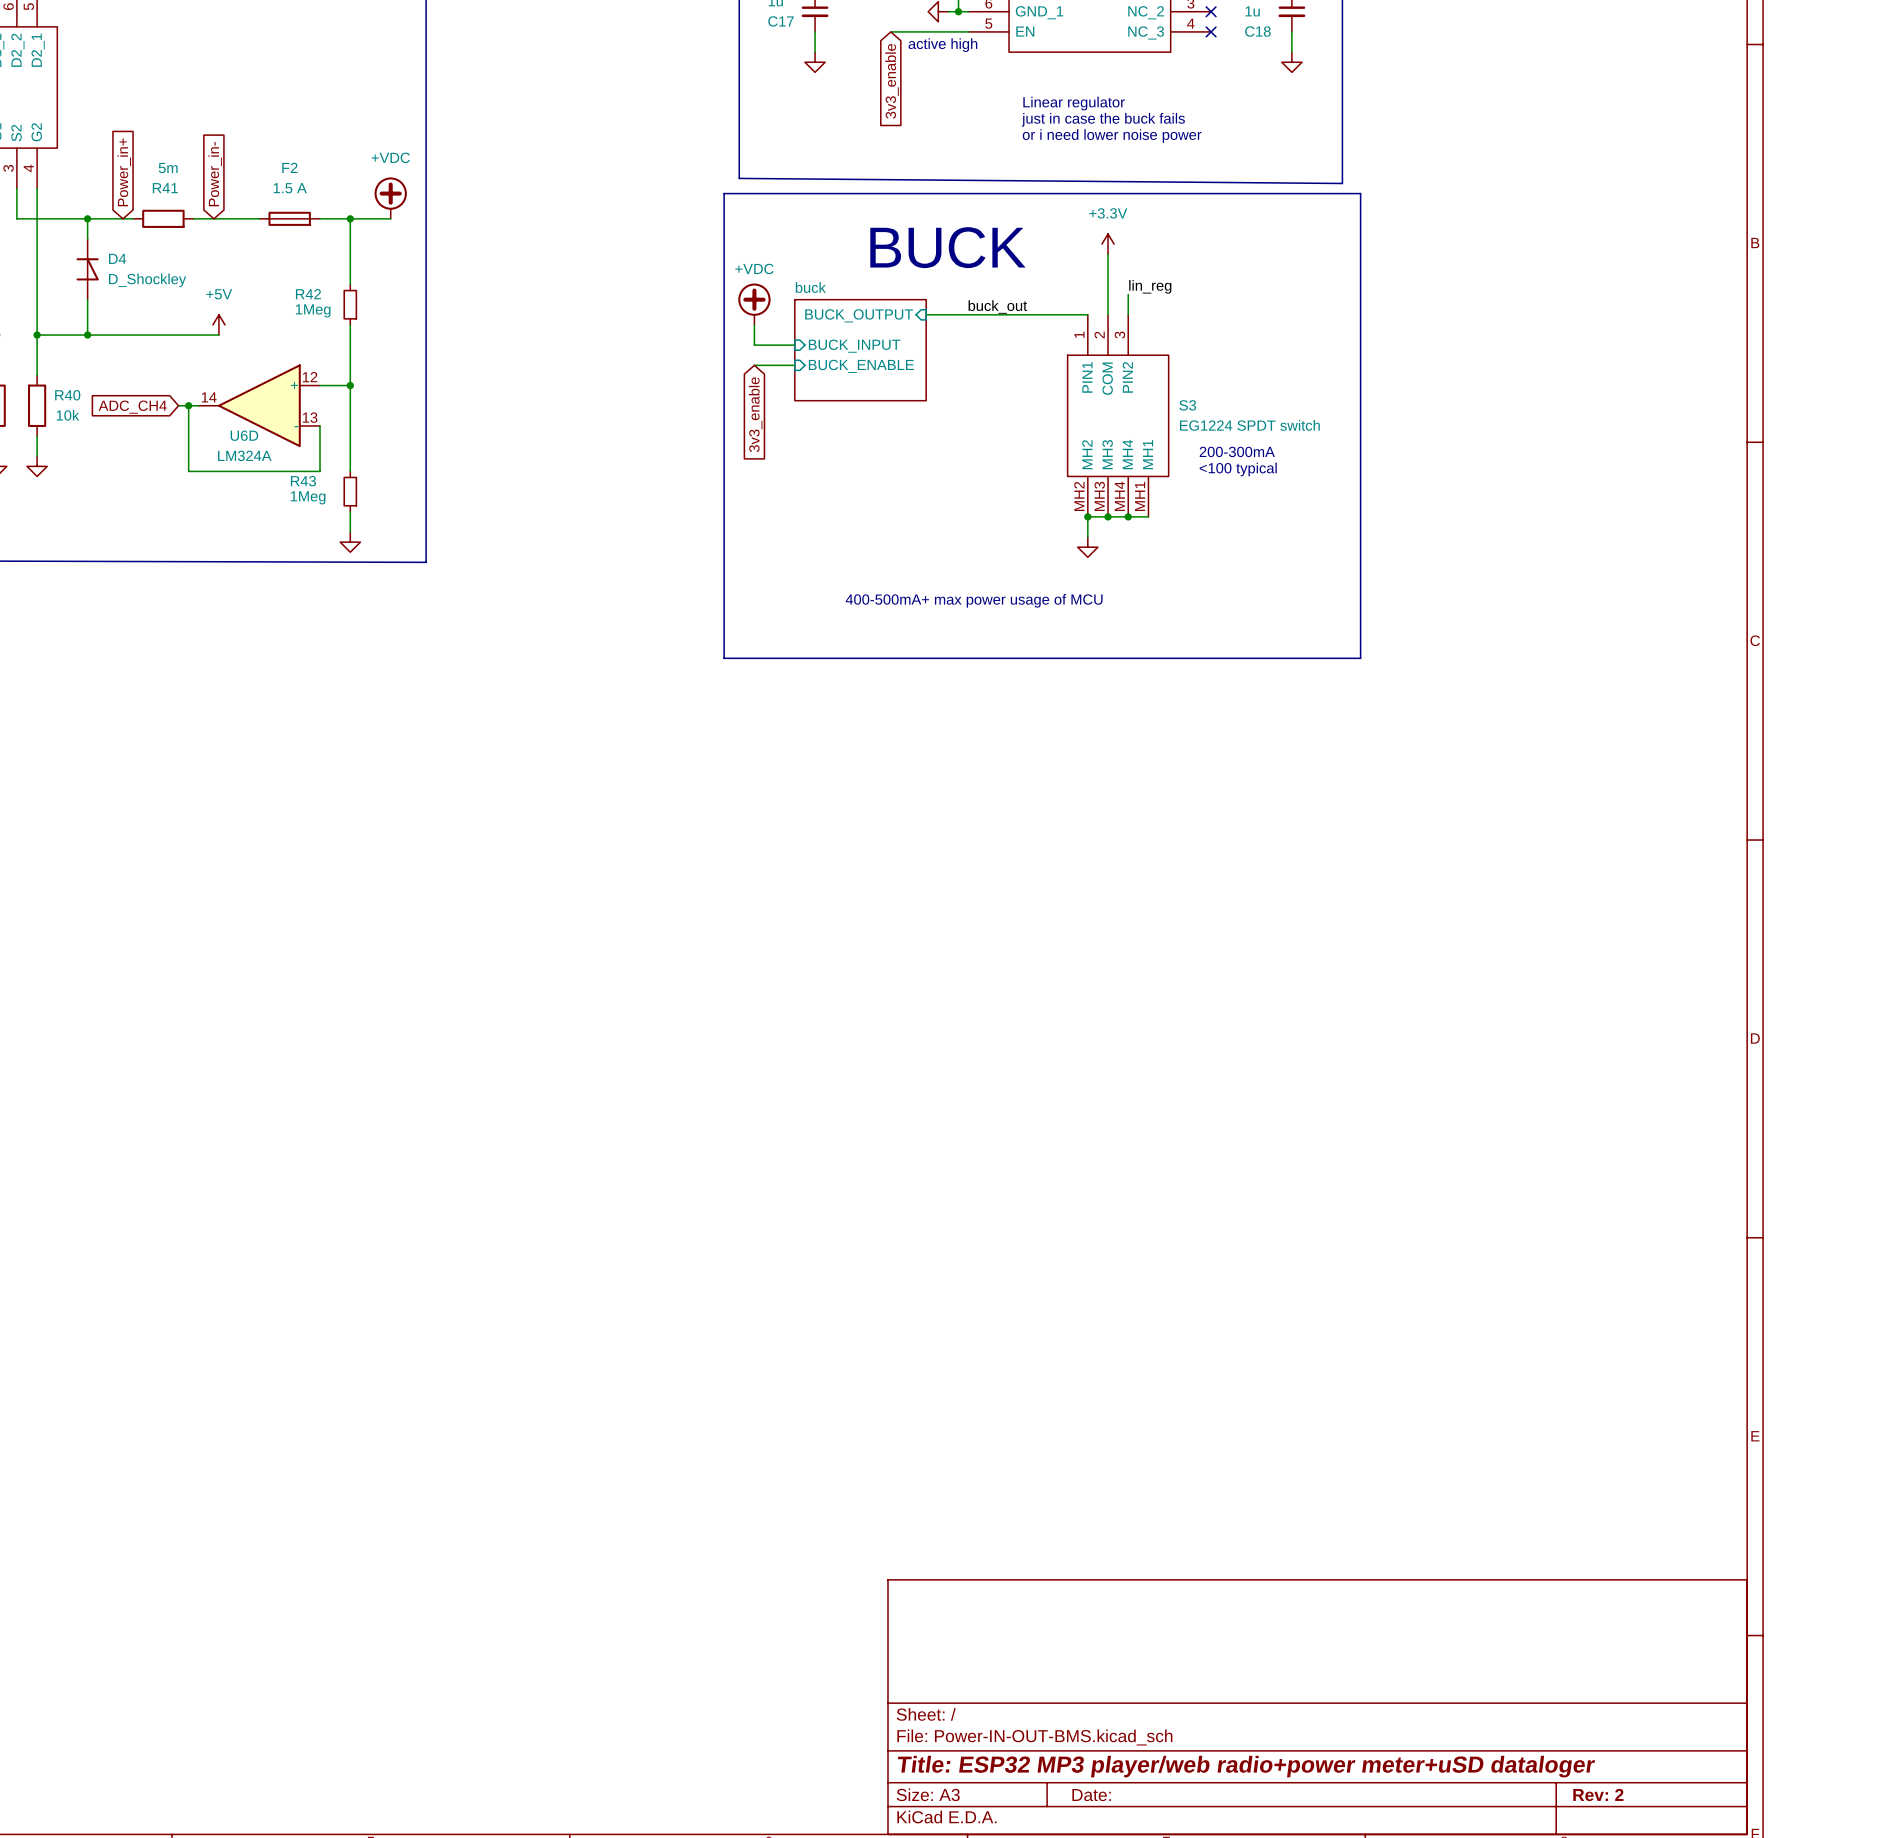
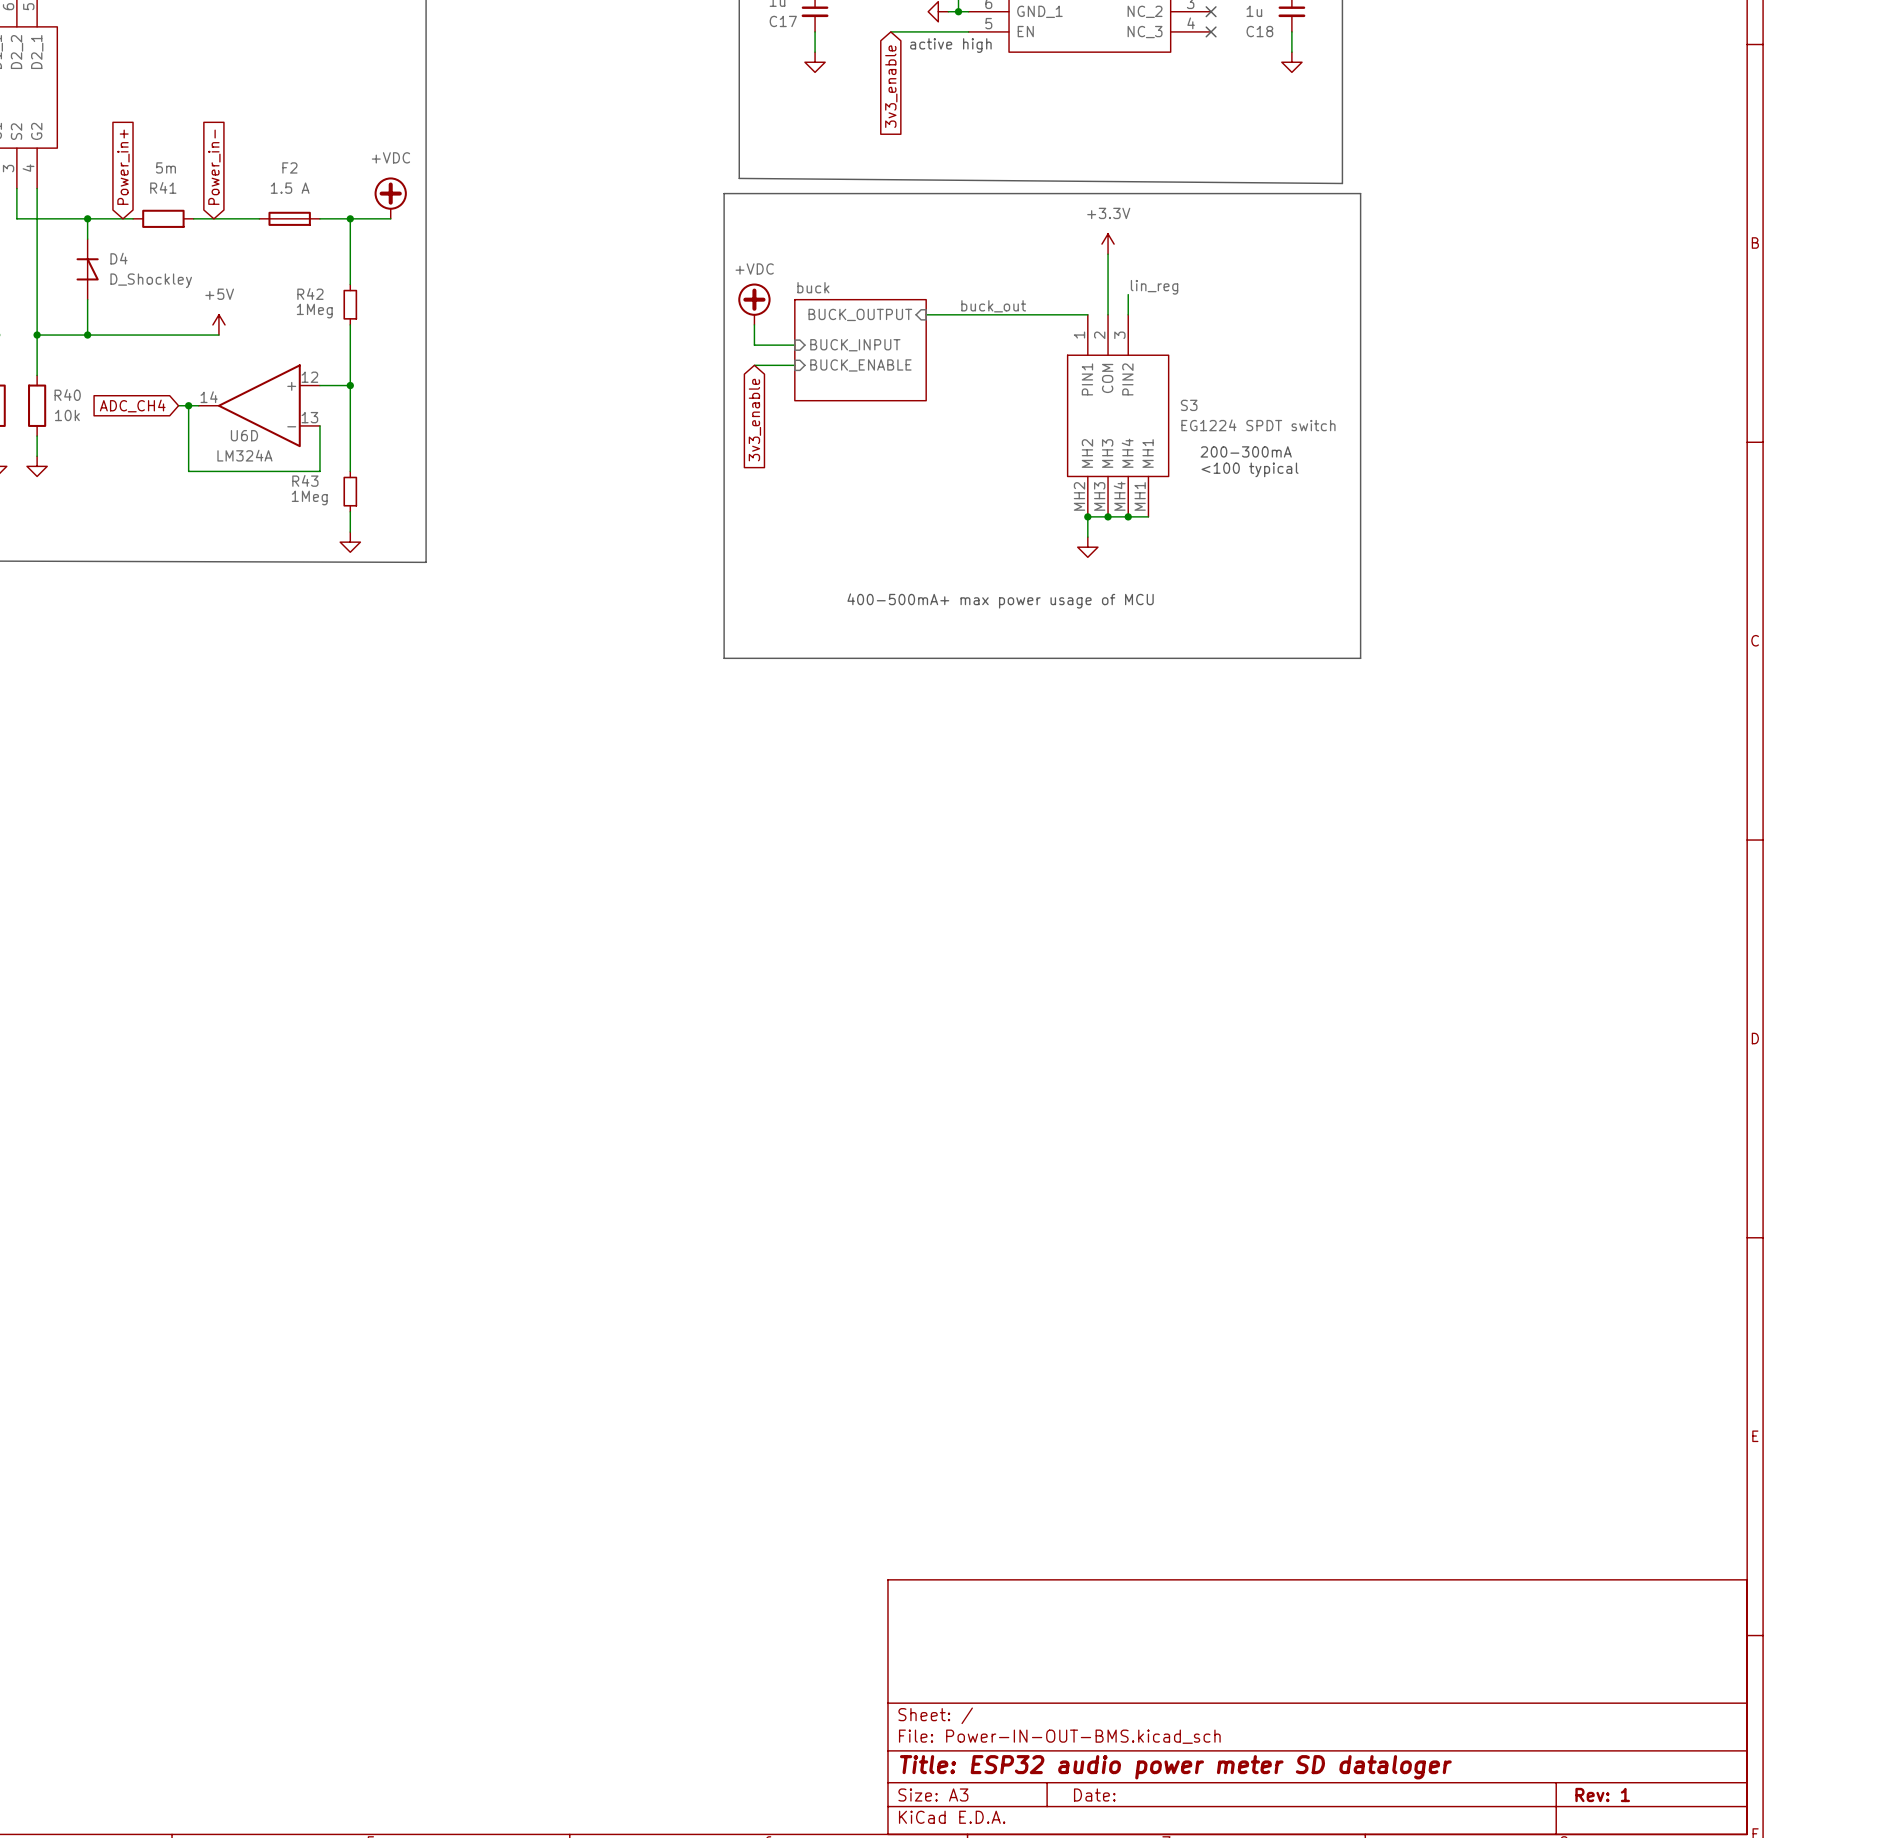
text: Linear regulator (1074, 103) -> none
text: just in case the buck fails (1103, 119) -> none
text: or i need lower noise power (1112, 136) -> none
text: BUCK (947, 247) -> none
title block: Title: ESP32 MP3 player/web radio+power meter+uSD dataloger (1246, 1766) -> Title: ESP32 audio power meter SD dataloger (1175, 1767)
title block: Rev: 2 (1598, 1794) -> Rev: 1 (1602, 1794)

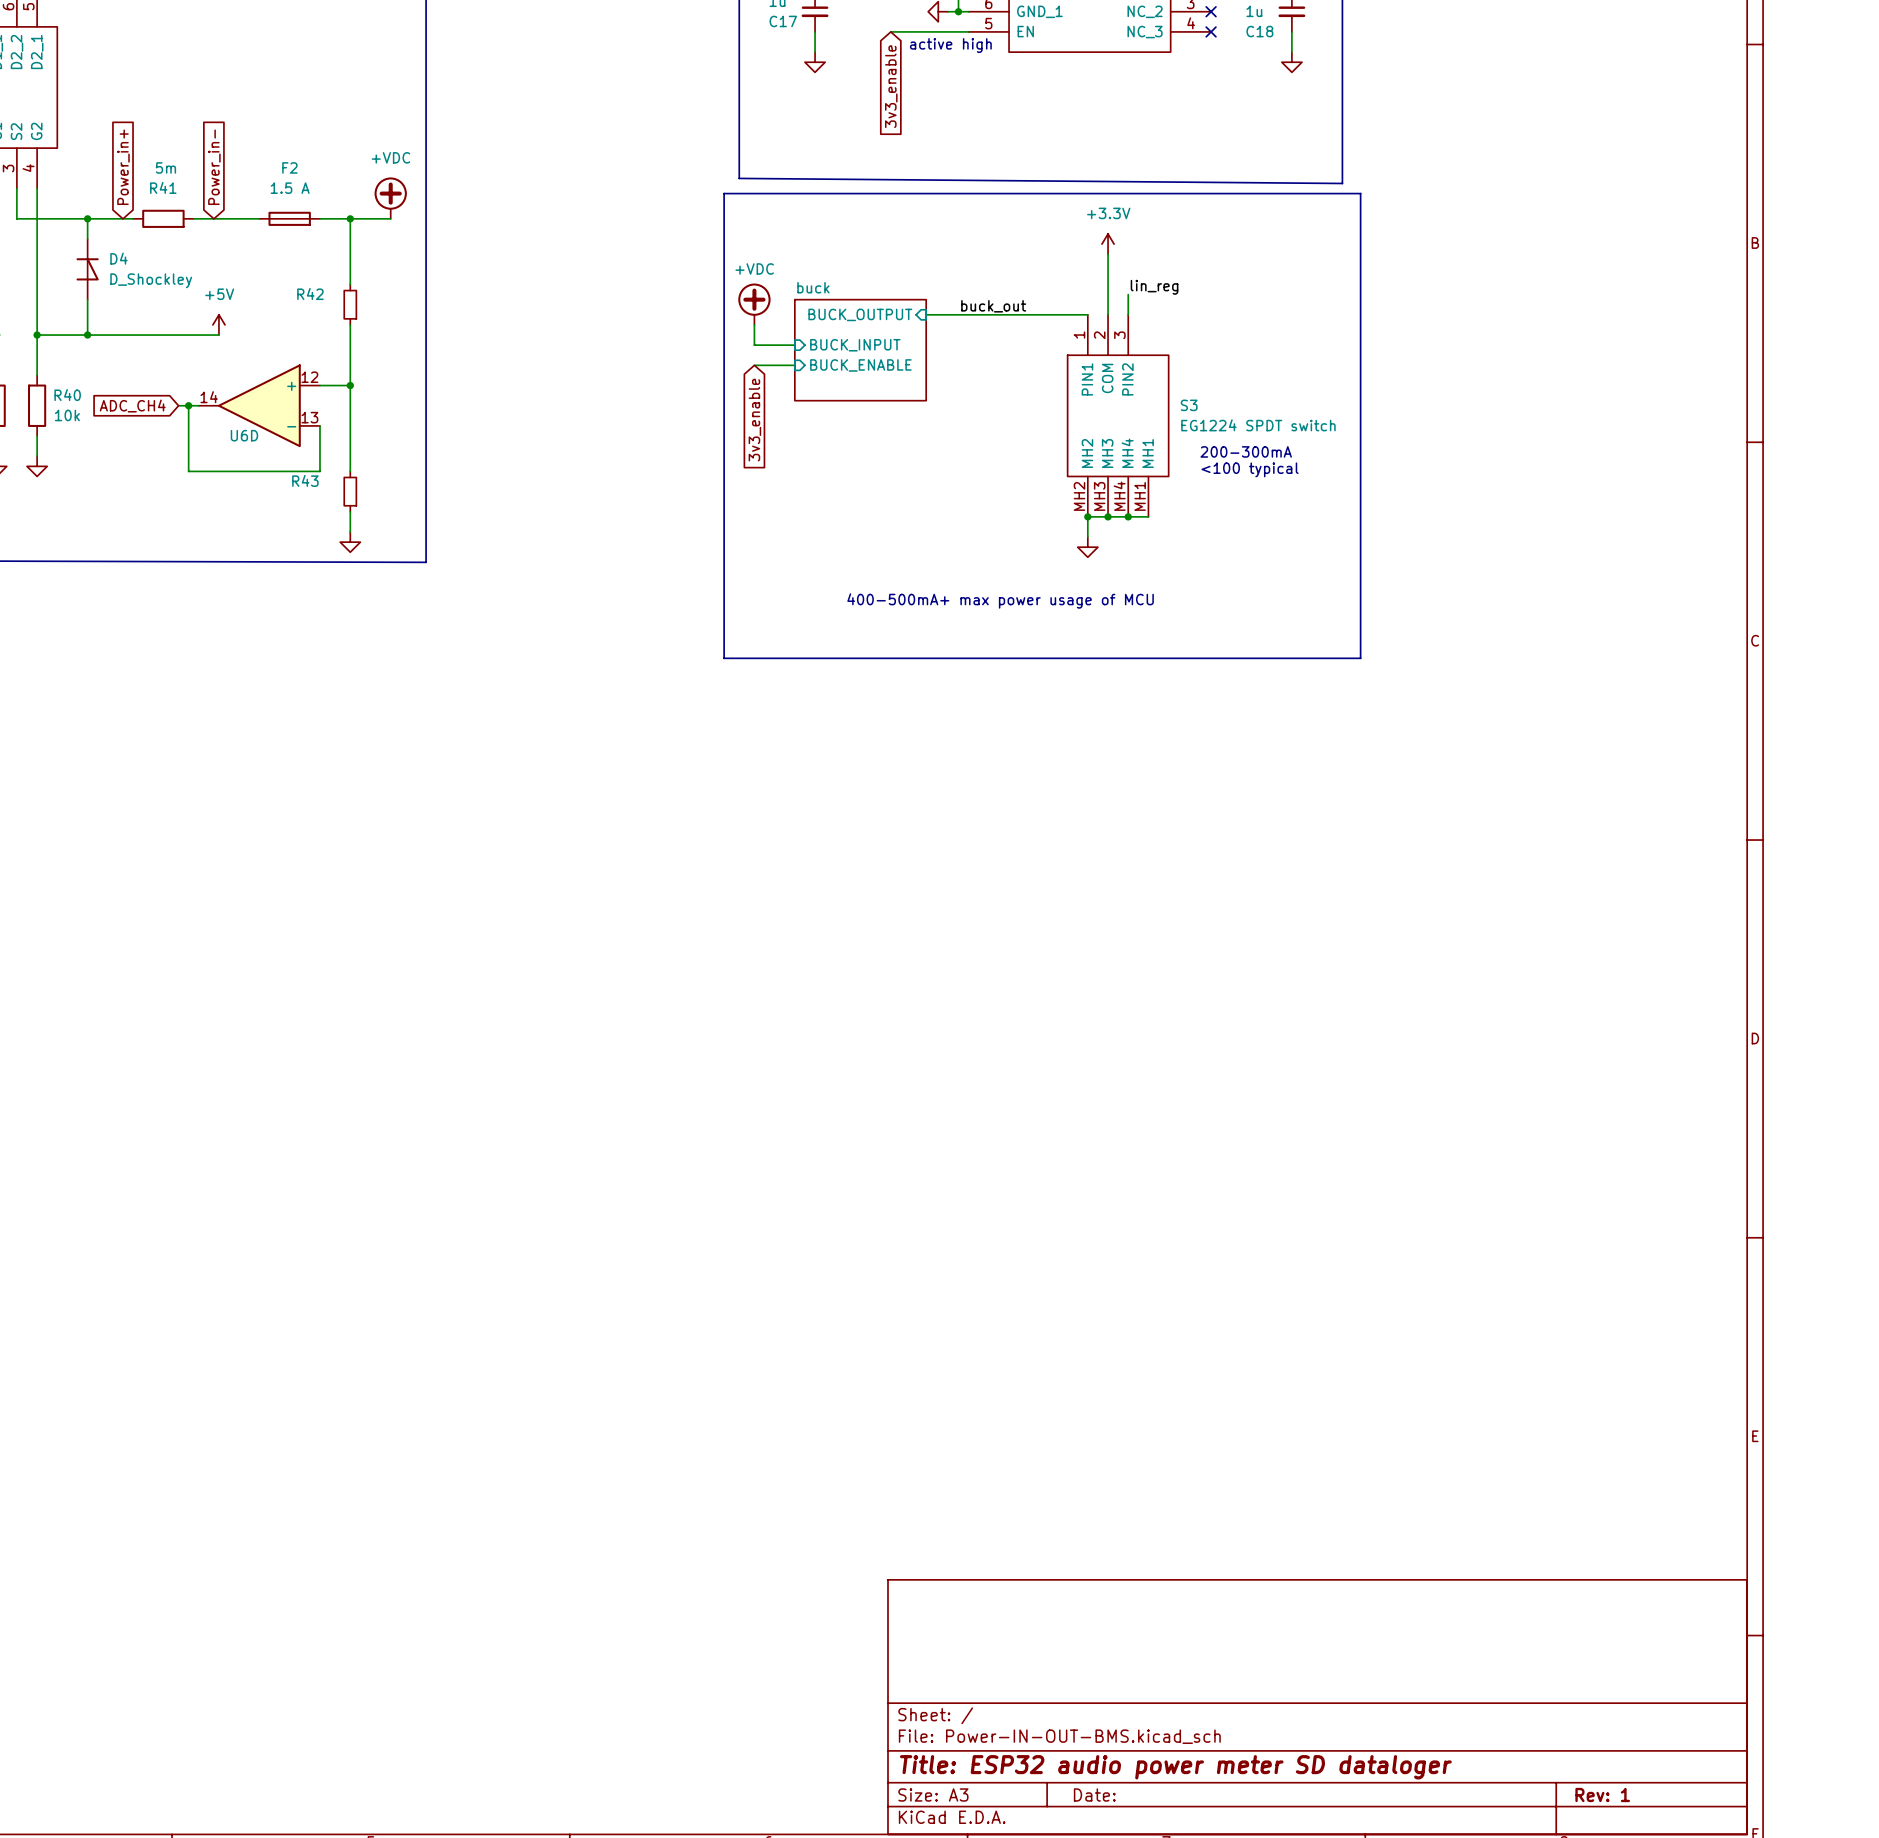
R42 value: 1Meg (314, 311) -> none
U6D value: LM324A (244, 455) -> none
R43 value: 1Meg (309, 497) -> none

